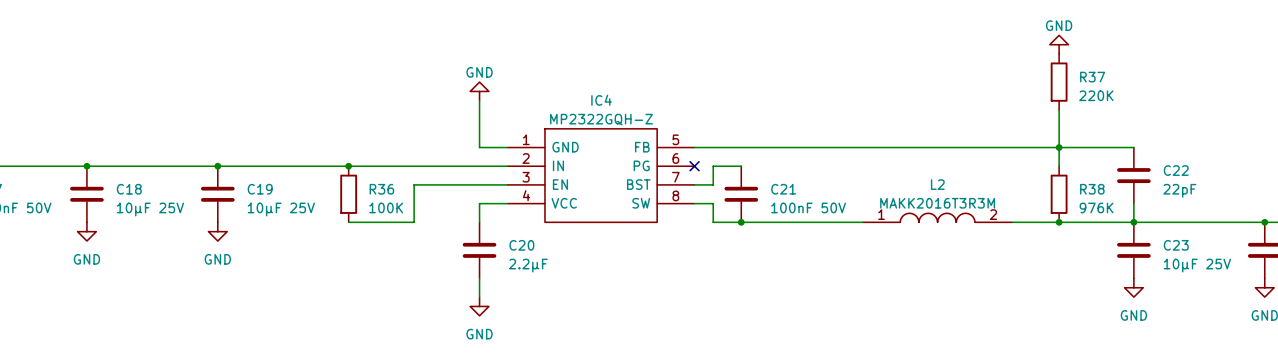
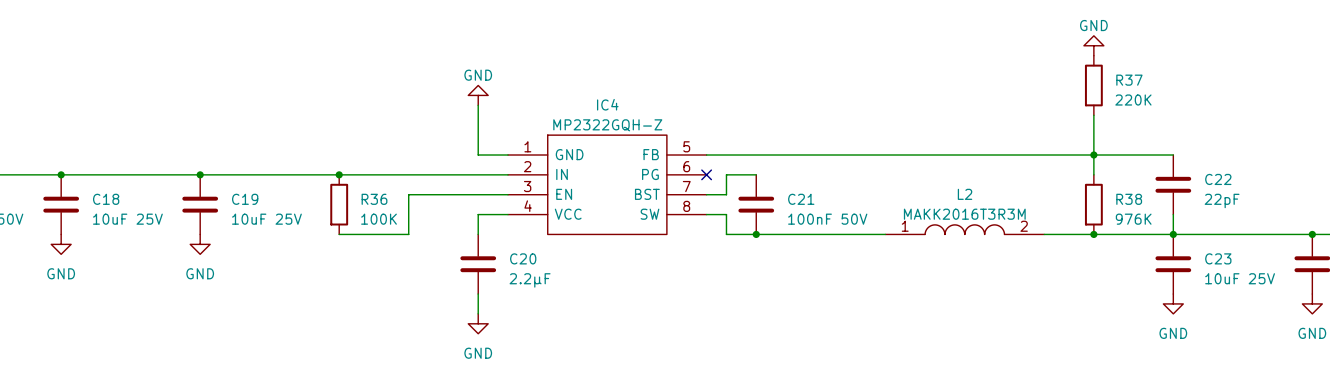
C18 value: 10µF 25V (150, 209) -> 10uF 25V (127, 219)
C19 value: 10µF 25V (281, 209) -> 10uF 25V (266, 219)
C23 value: 10µF 25V (1197, 265) -> 10uF 25V (1240, 278)

